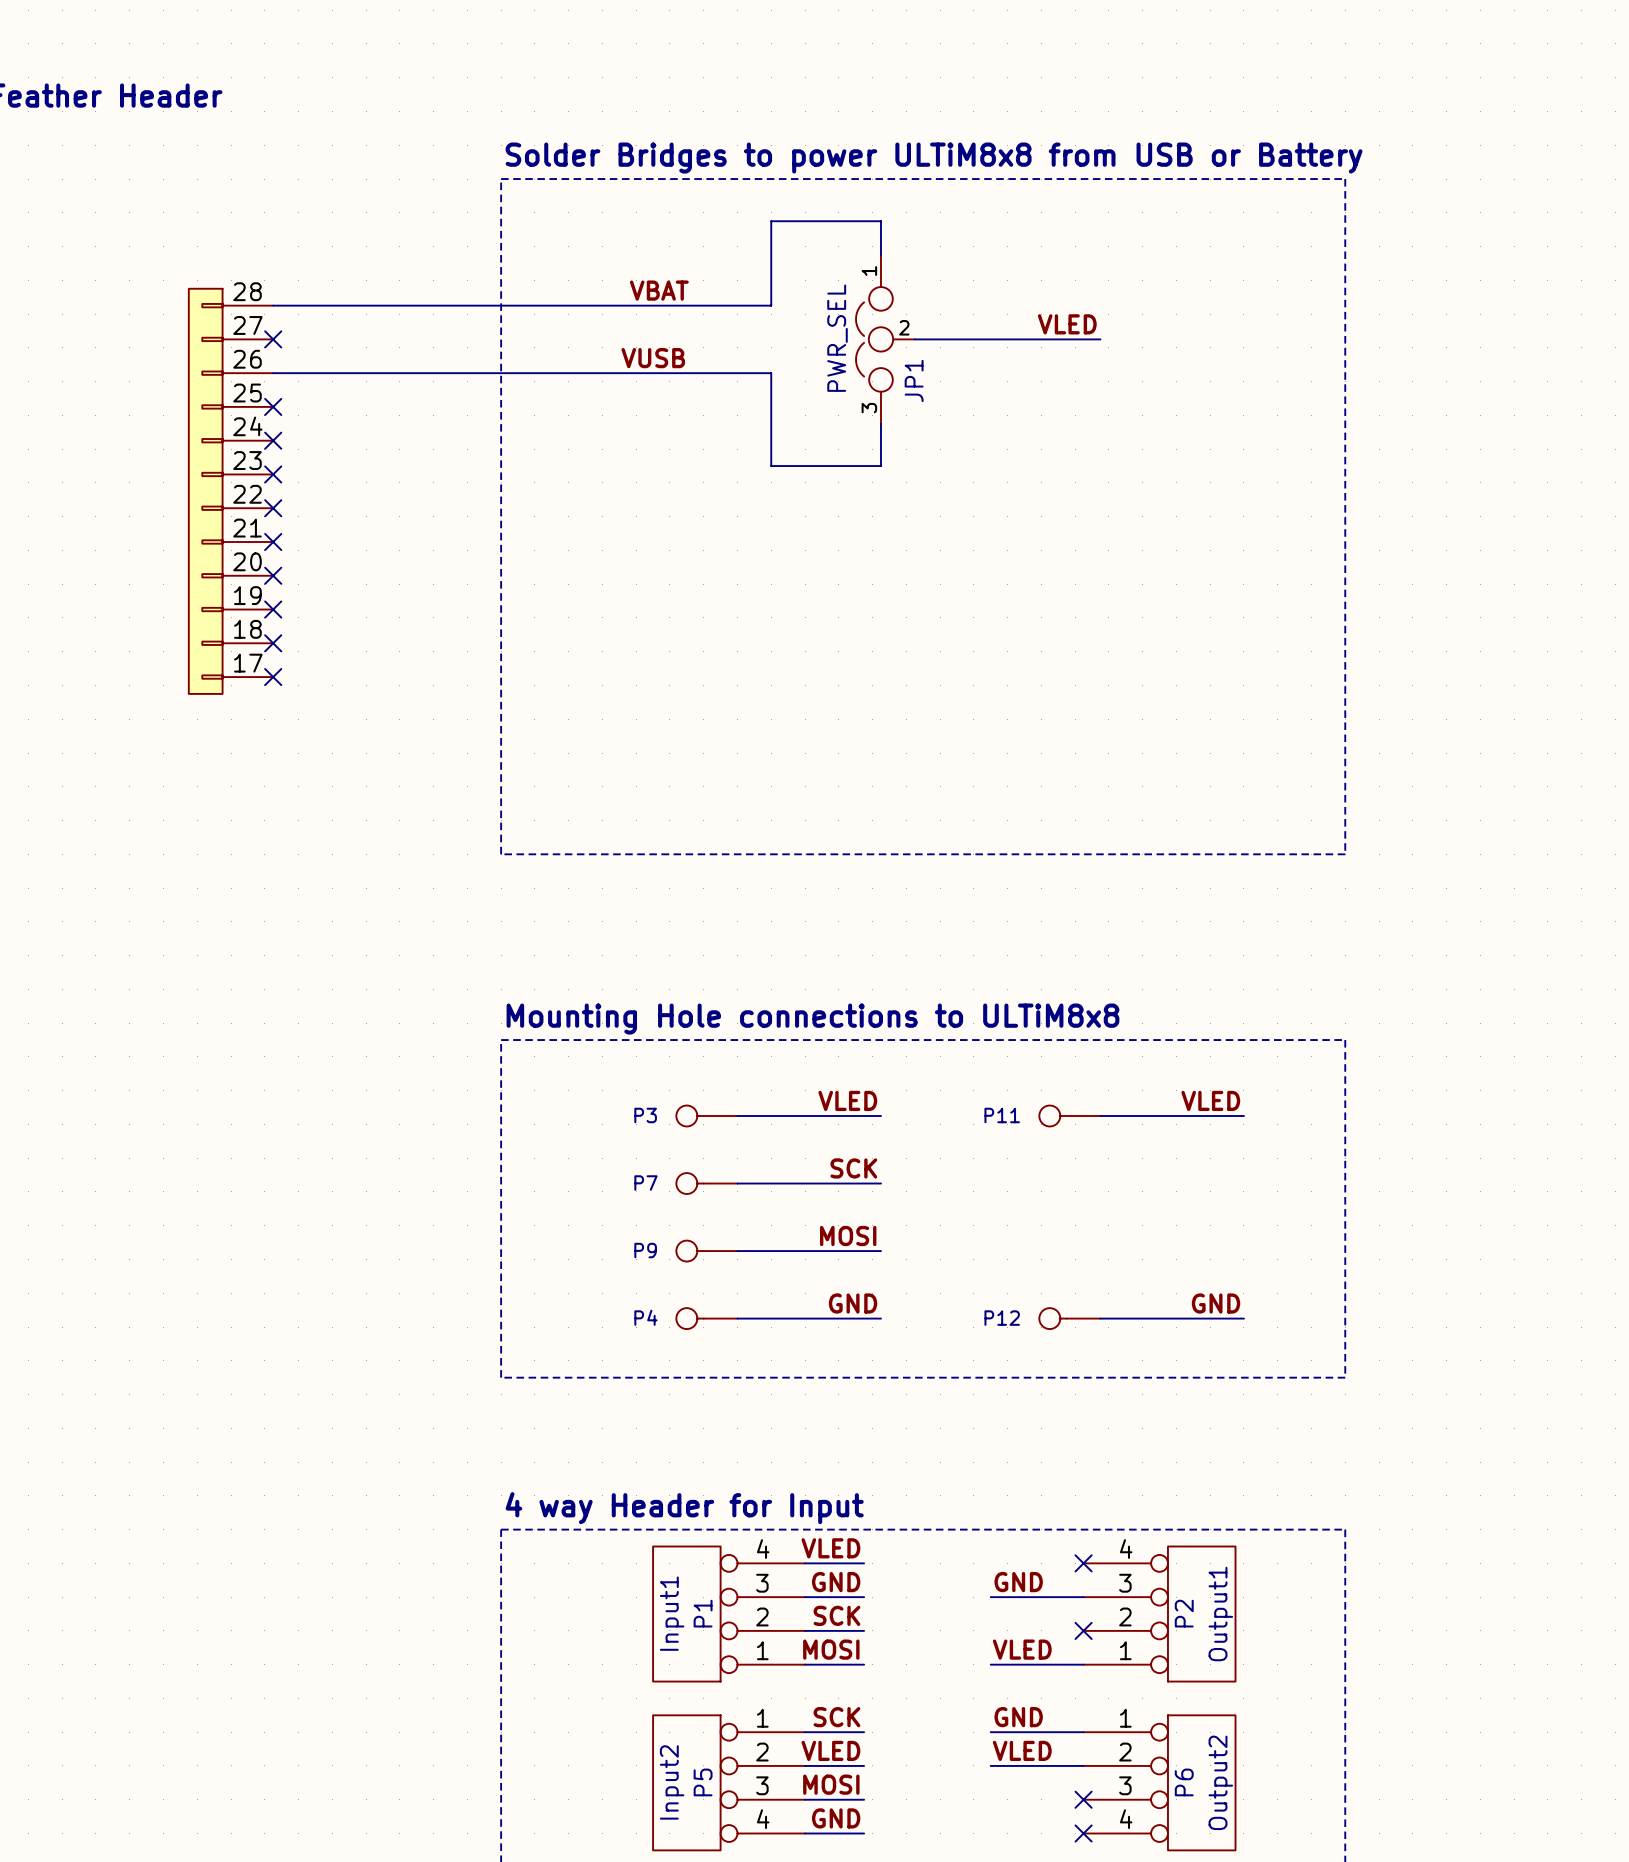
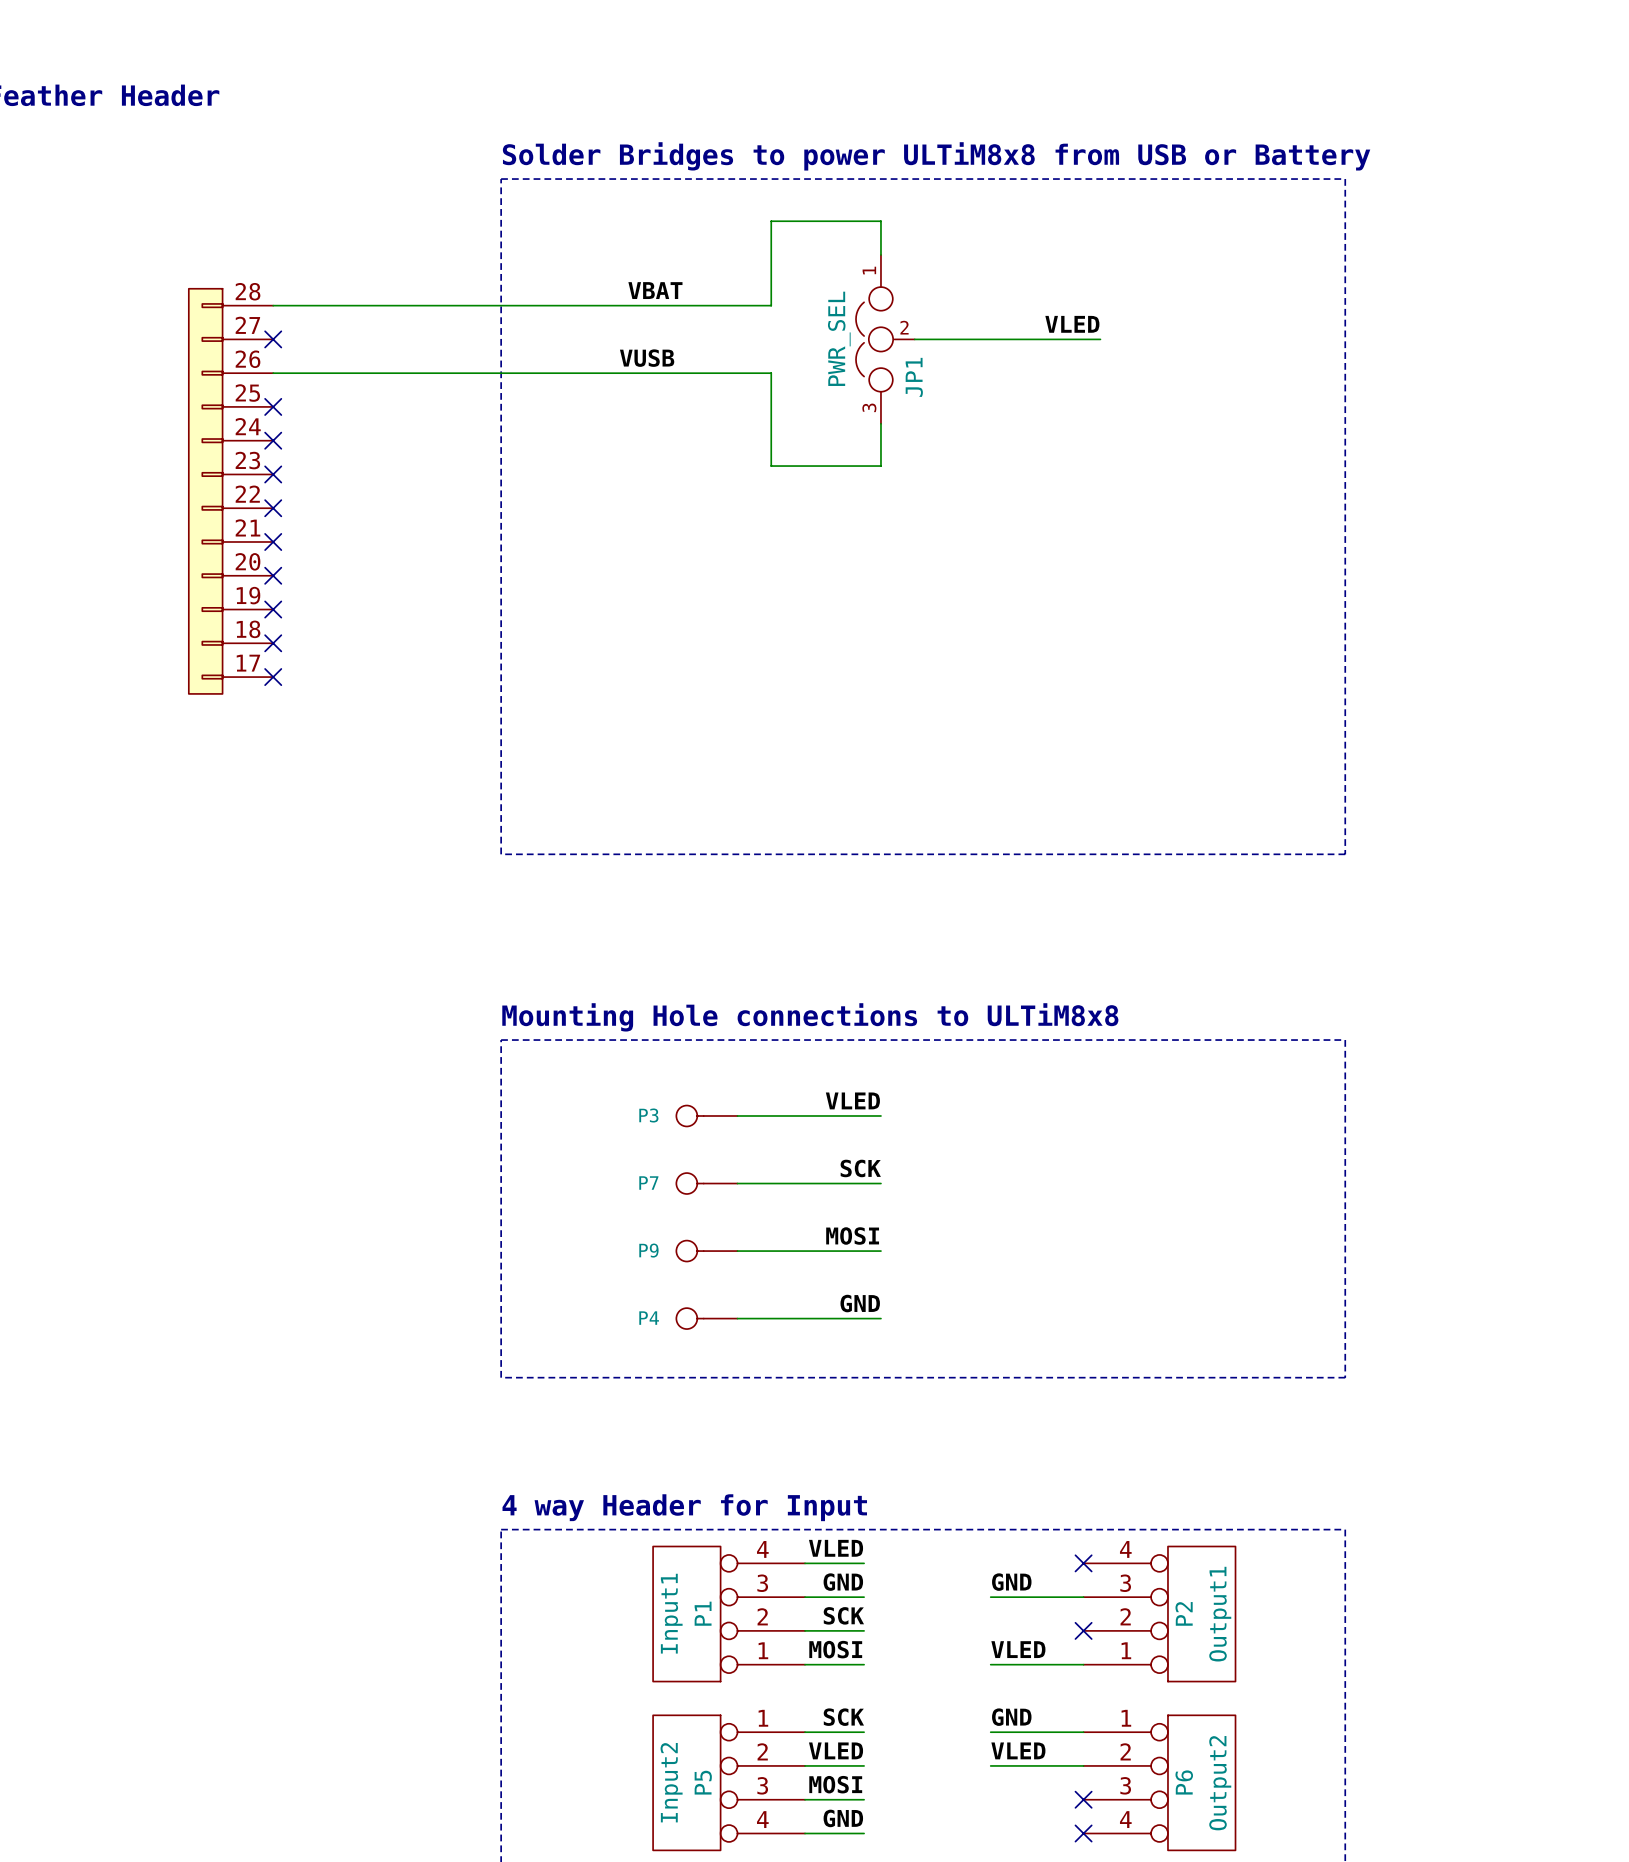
label: VLED (1210, 1100) -> none
P11: (1069, 1115) -> none
wire: (1100, 1115) (1243, 1115) -> none
label: GND (1216, 1303) -> none
P12: (1069, 1318) -> none
wire: (1100, 1318) (1243, 1318) -> none

